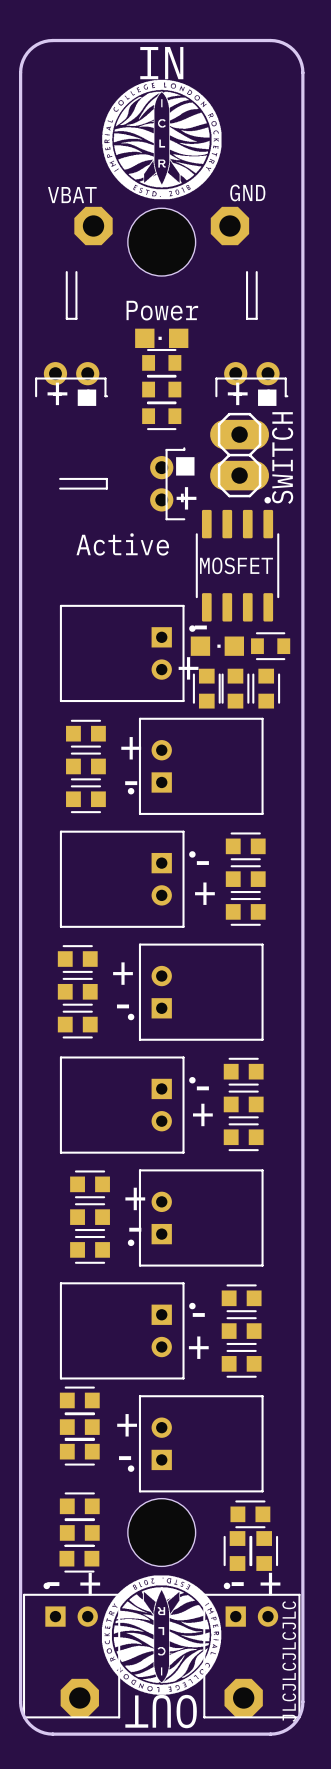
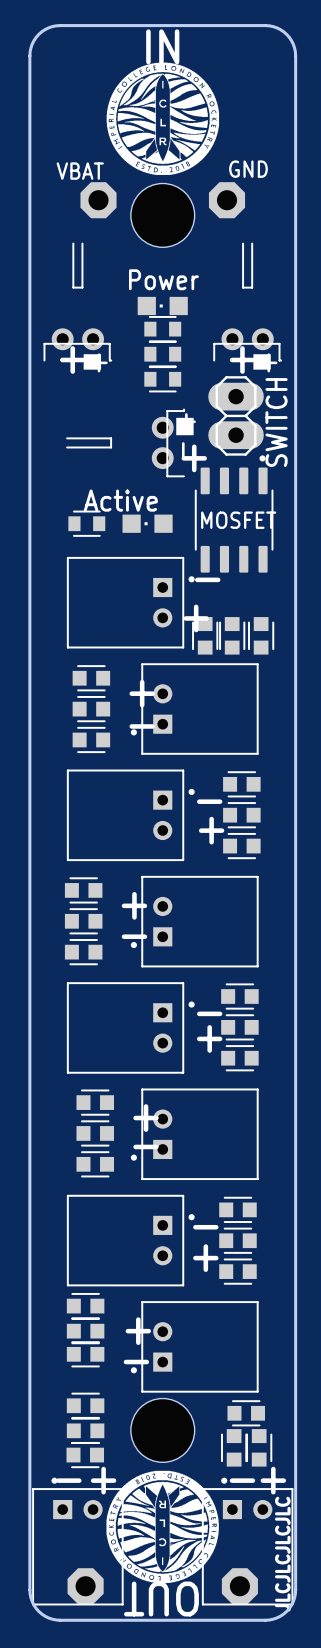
part rotation: 0° (217, 646) -> 180° (147, 523)
part position: (217, 646) -> (147, 523)
part position: (270, 646) -> (86, 523)

